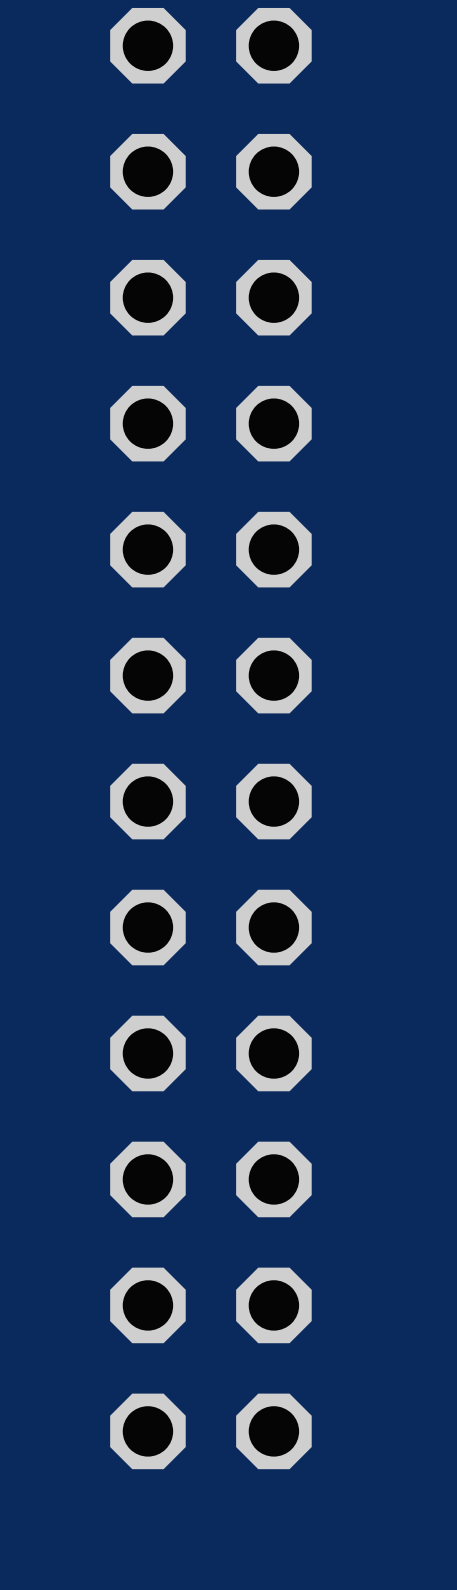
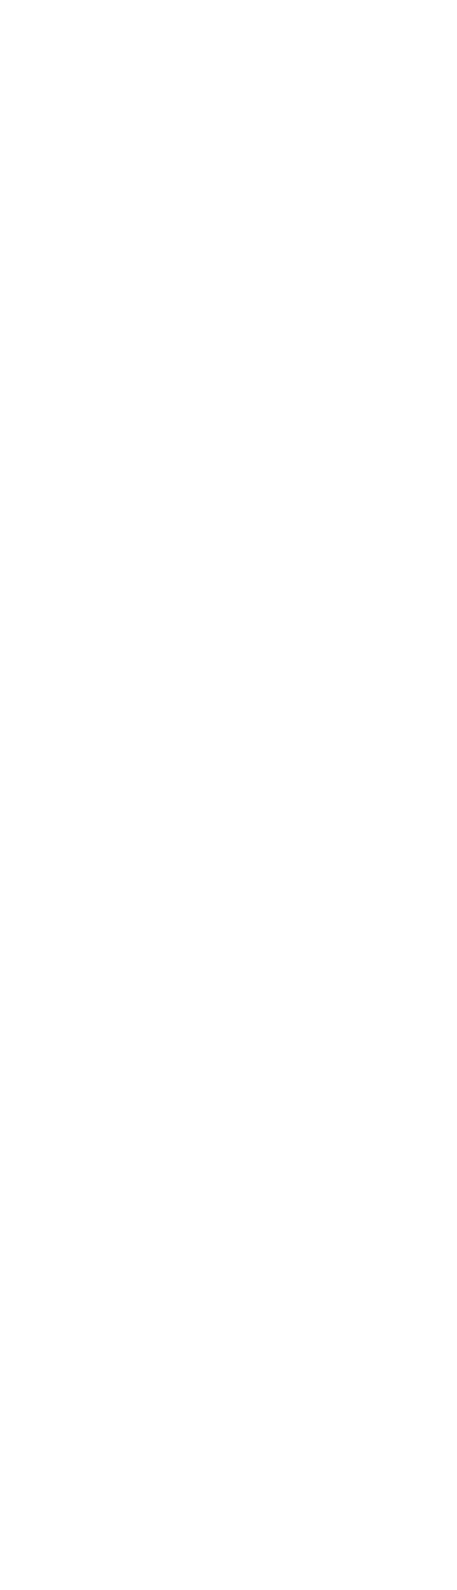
part: (210, 738) -> none

